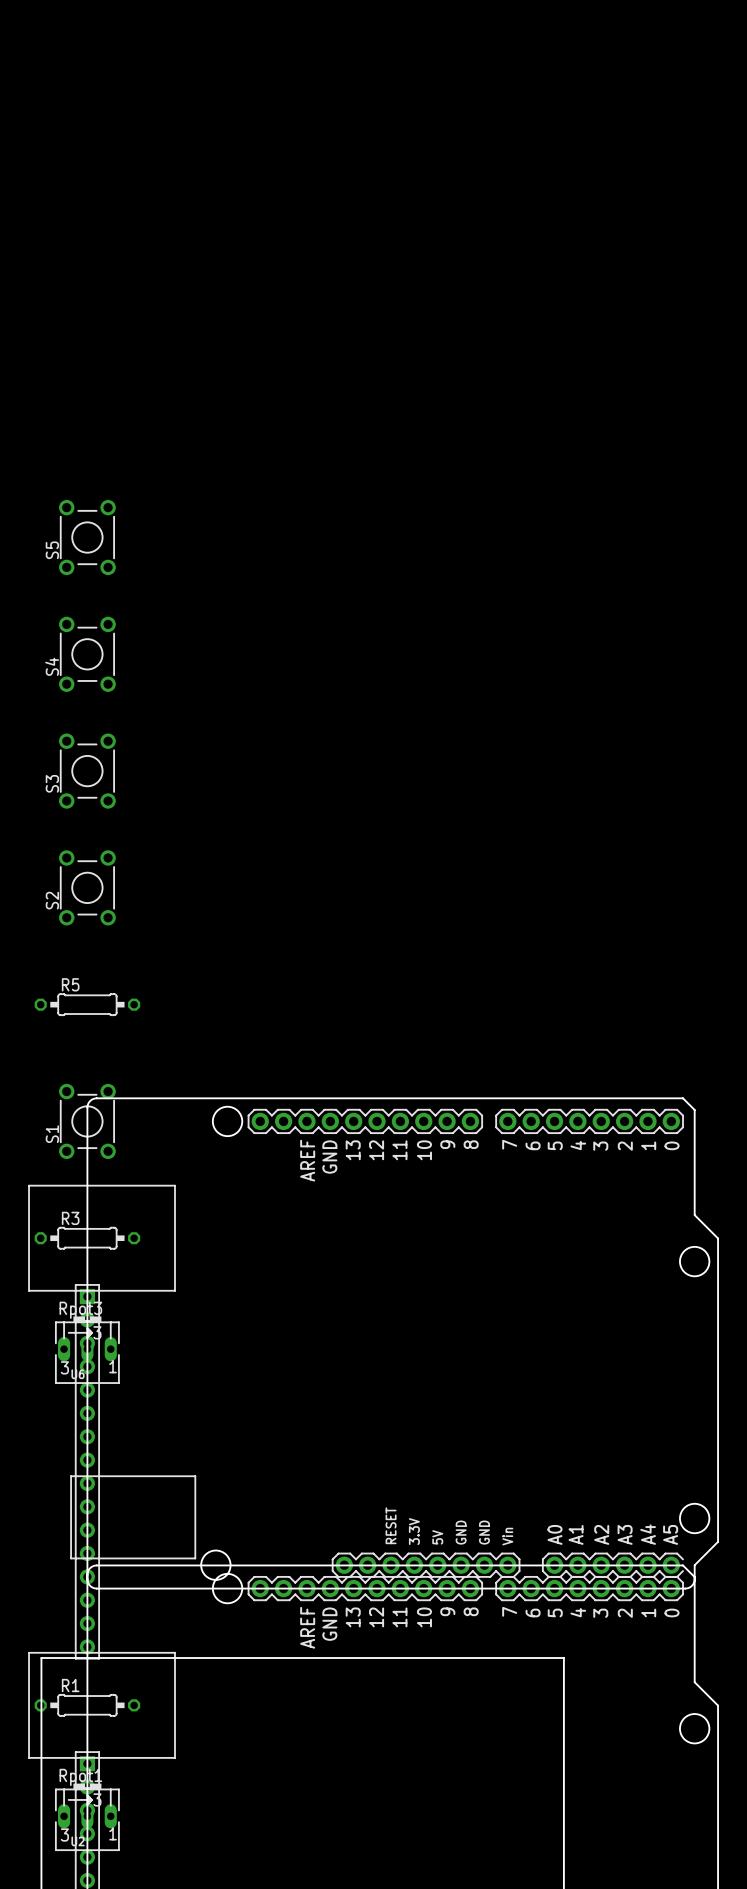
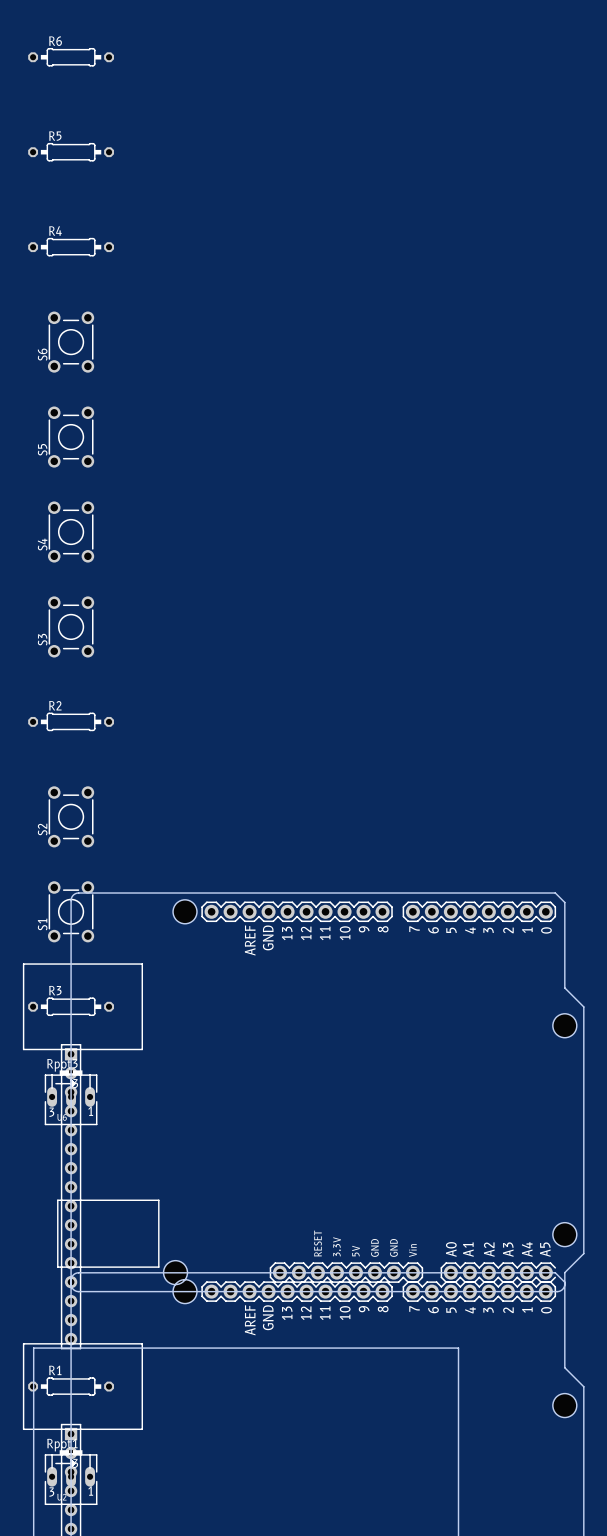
R6: none -> (71, 57)
R4: none -> (71, 247)
S6: none -> (71, 342)
S2 position: (87, 887) -> (71, 816)
R2: none -> (71, 721)
R5 position: (87, 1004) -> (71, 152)

